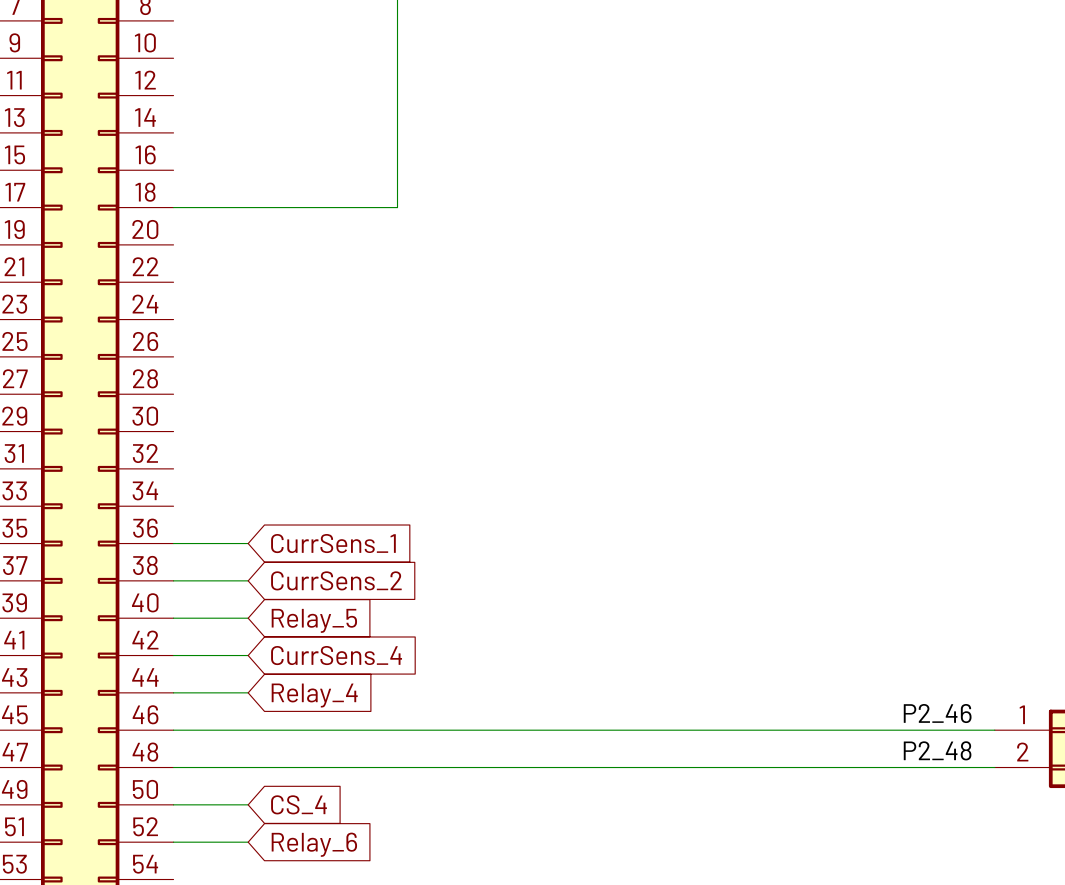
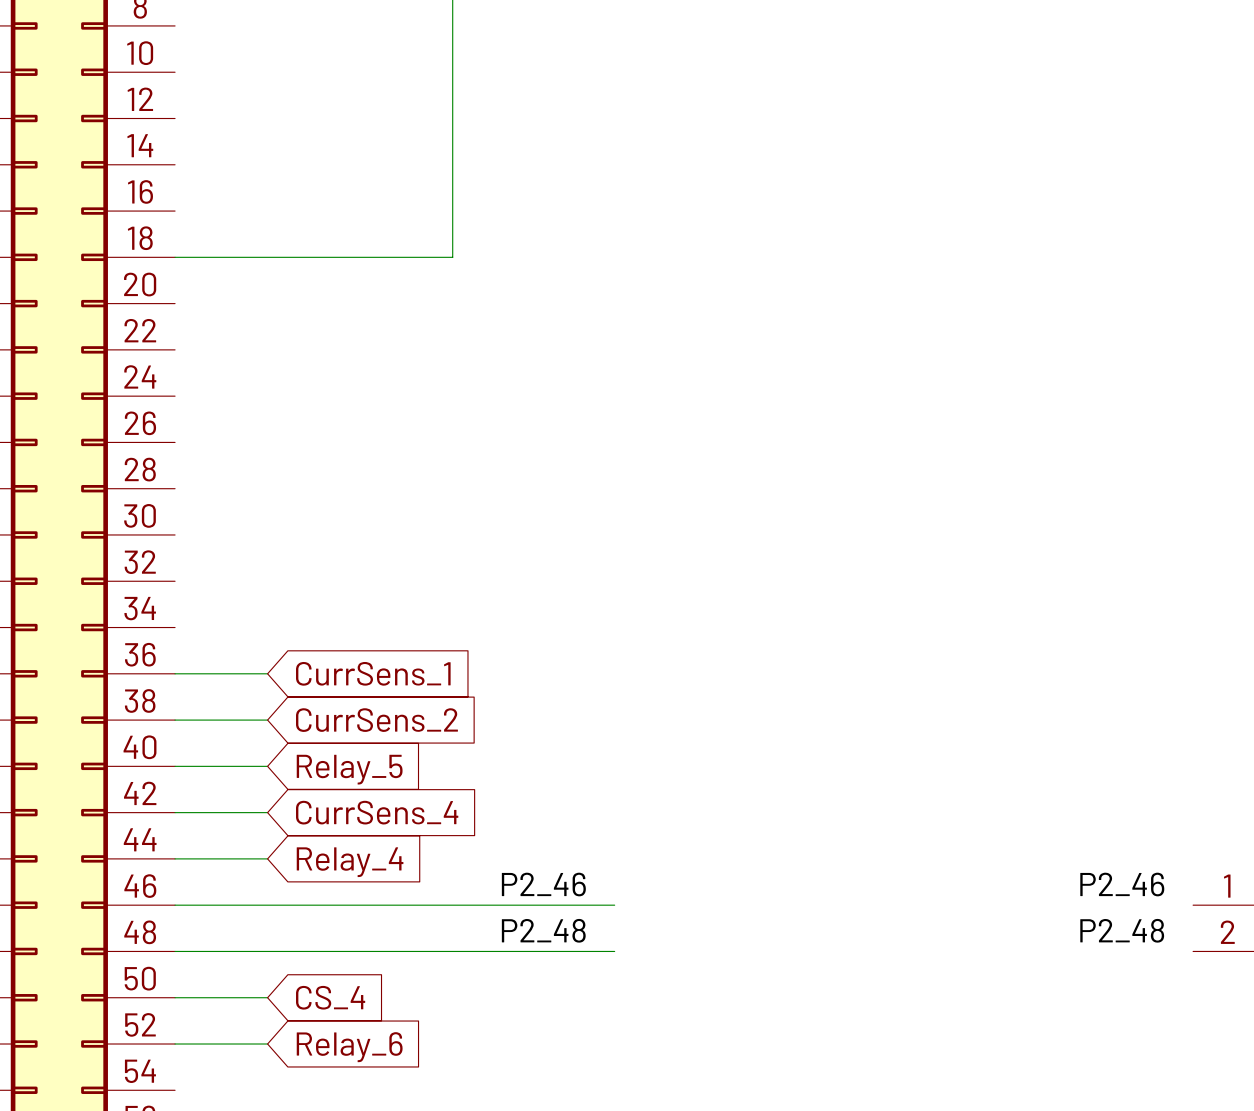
label: none -> P2_46 (543, 884)
wire: (528, 730) (994, 730) -> none
label: none -> P2_48 (543, 930)
wire: (528, 767) (994, 767) -> none

